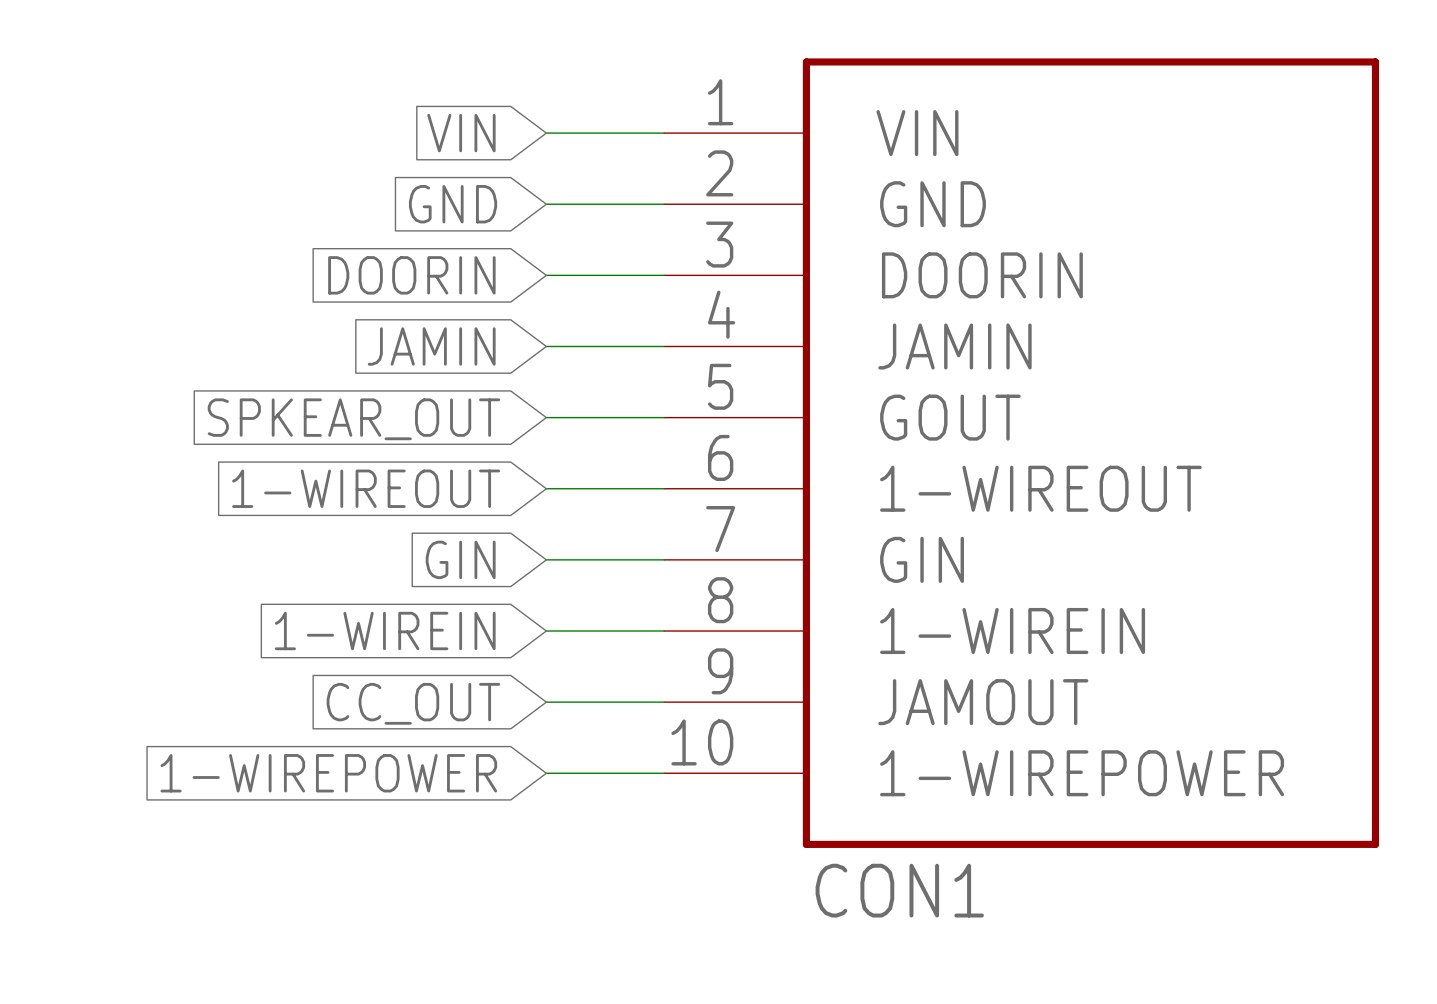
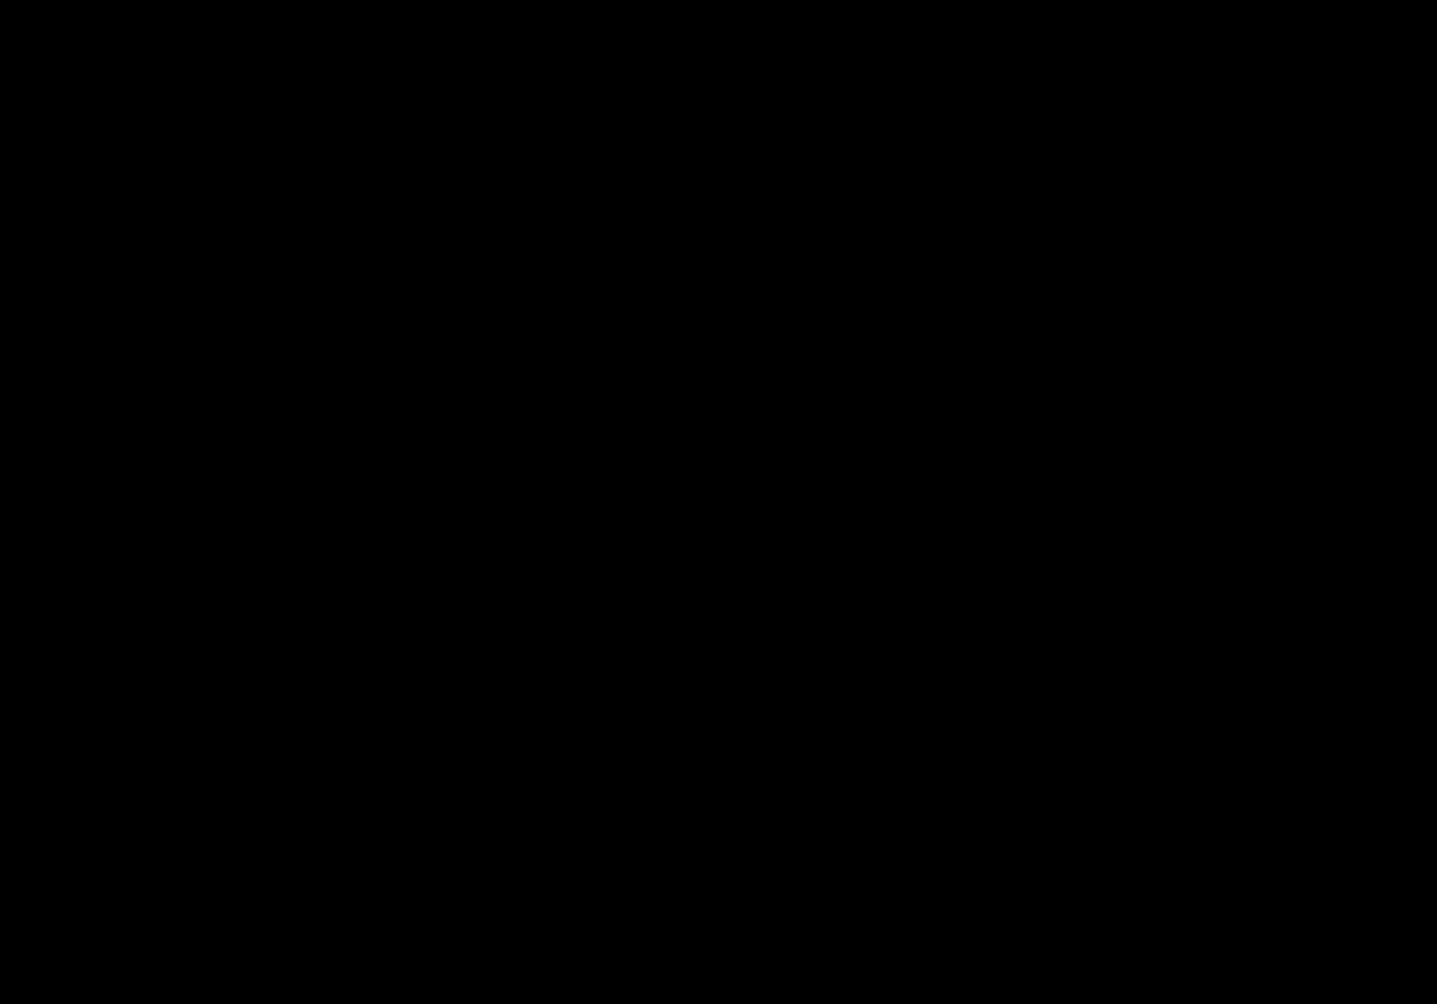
global label: VIN (461, 133) -> none
wire: (546, 133) (664, 133) -> none
global label: GND (453, 204) -> none
wire: (546, 204) (664, 204) -> none
global label: DOORIN (411, 275) -> none
wire: (546, 275) (664, 275) -> none
global label: JAMIN (431, 346) -> none
wire: (546, 346) (664, 346) -> none
wire: (546, 417) (664, 417) -> none
global label: SPKEAR_OUT (353, 419) -> none
CON1: (1021, 453) -> none
global label: 1-WIREOUT (366, 488) -> none
wire: (546, 488) (664, 488) -> none
global label: GIN (460, 559) -> none
wire: (546, 559) (664, 559) -> none
global label: 1-WIREIN (385, 631) -> none
wire: (546, 631) (664, 631) -> none
wire: (546, 702) (664, 702) -> none
global label: CC_OUT (413, 703) -> none
global label: 1-WIREPOWER (328, 773) -> none
wire: (546, 773) (664, 773) -> none

